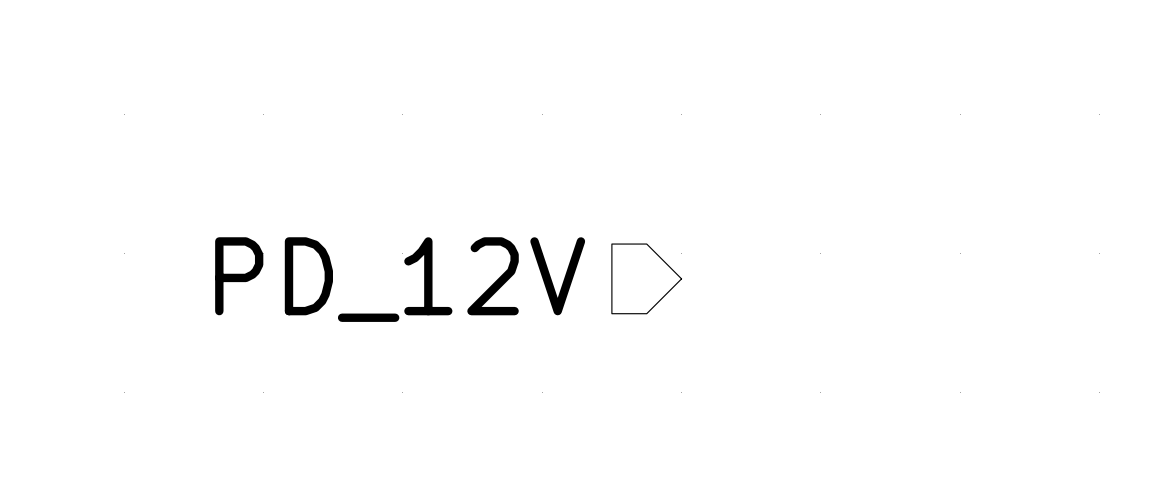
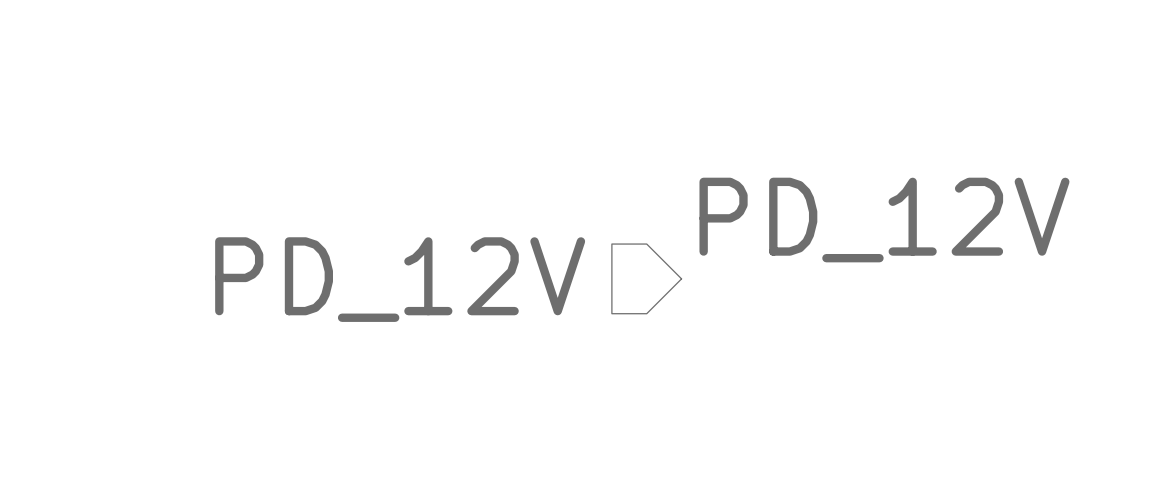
label: none -> PD_12V (884, 220)

